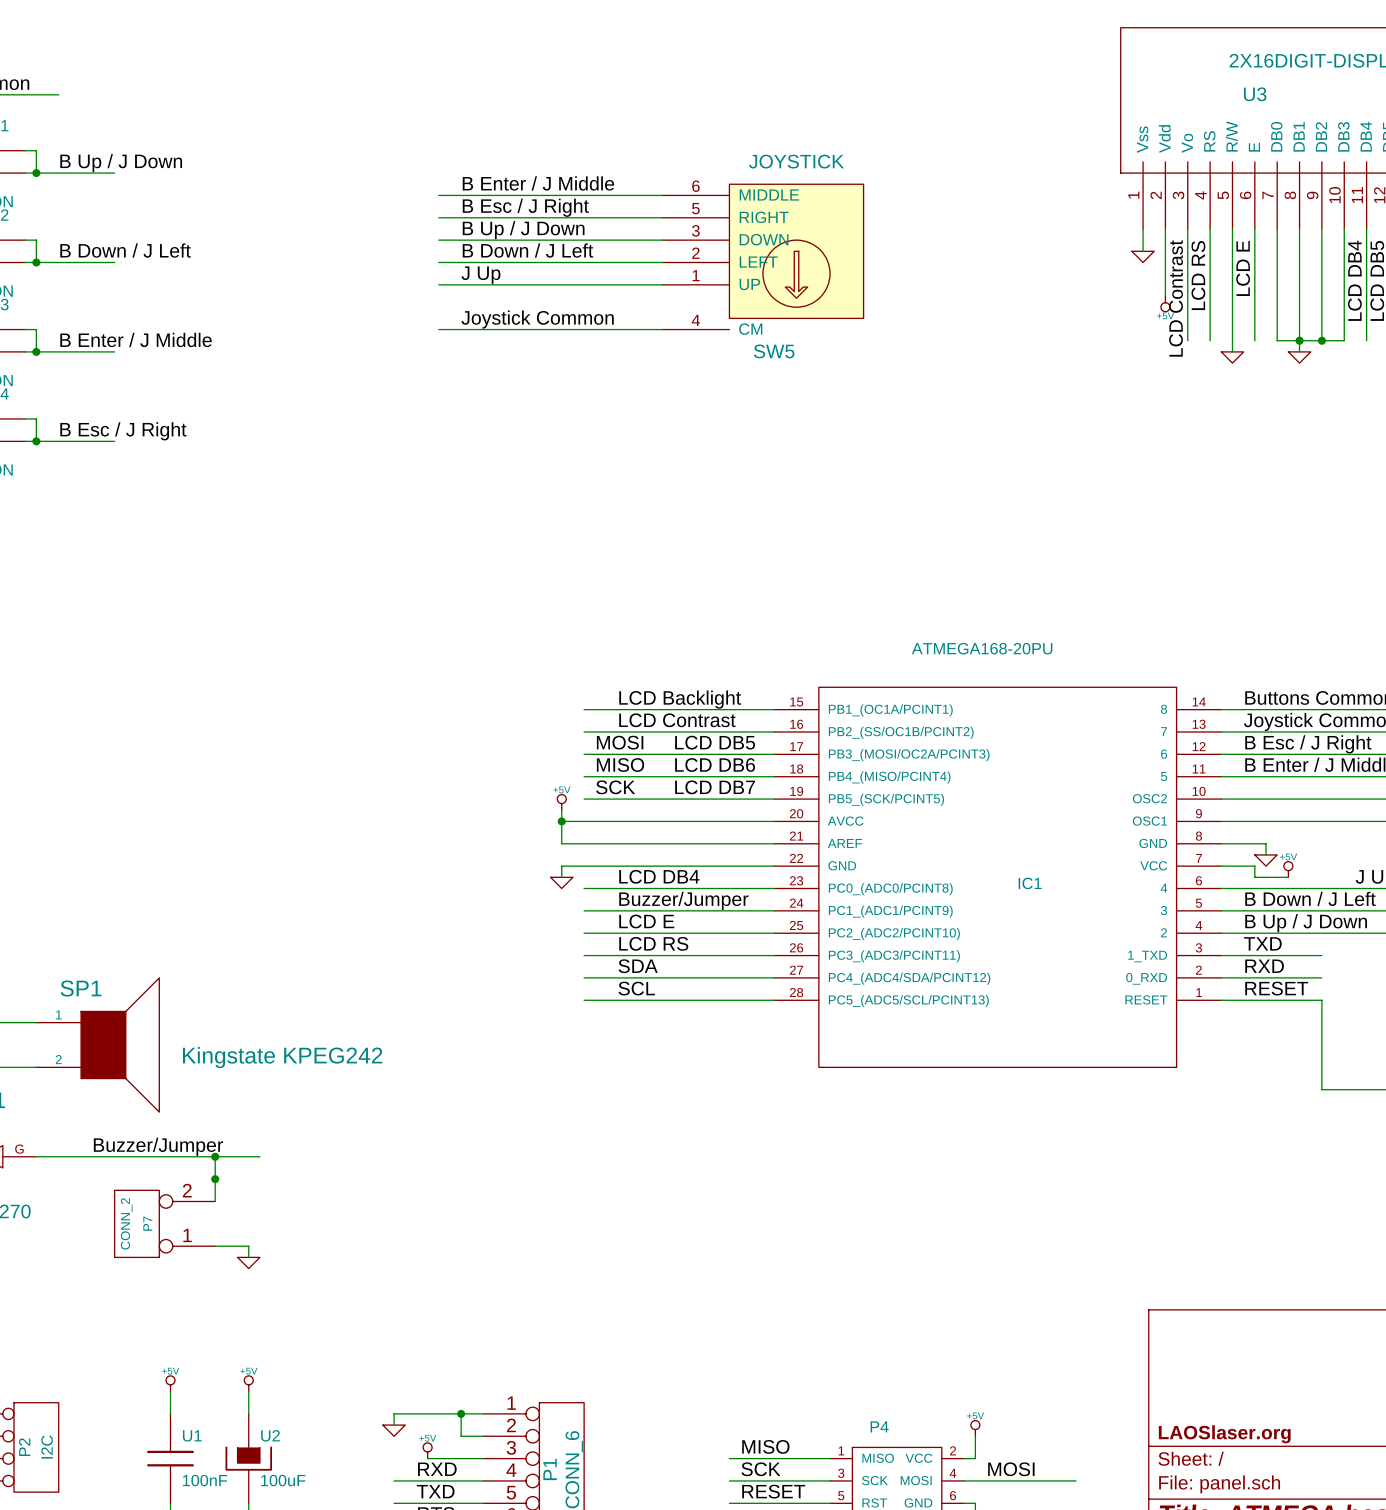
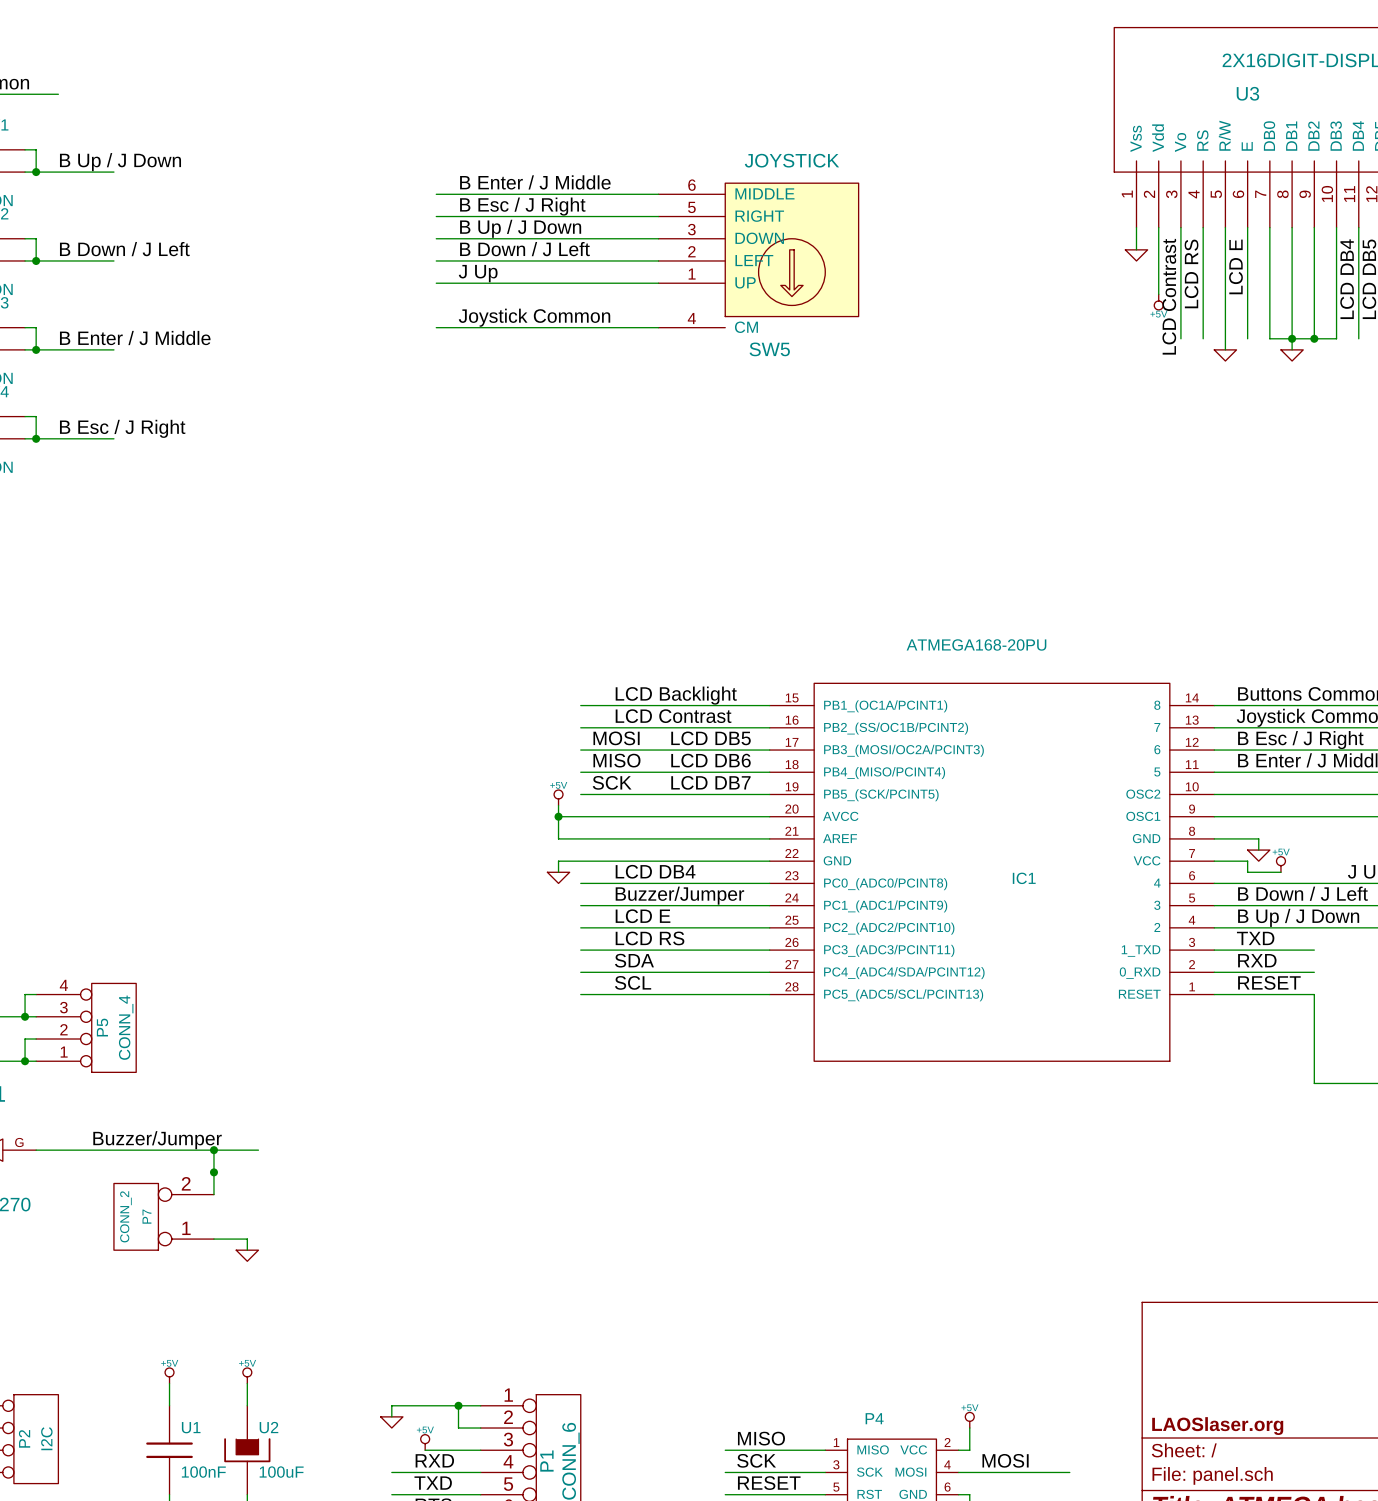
wire: none -> (36, 994) (25, 994) (25, 1016)
junction: none -> (25, 1016)
P5: none -> CONN_4 (86, 1027)
wire: none -> (36, 1039) (25, 1039) (25, 1061)
SP1: Kingstate KPEG242 (97, 1045) -> none
junction: none -> (25, 1061)

